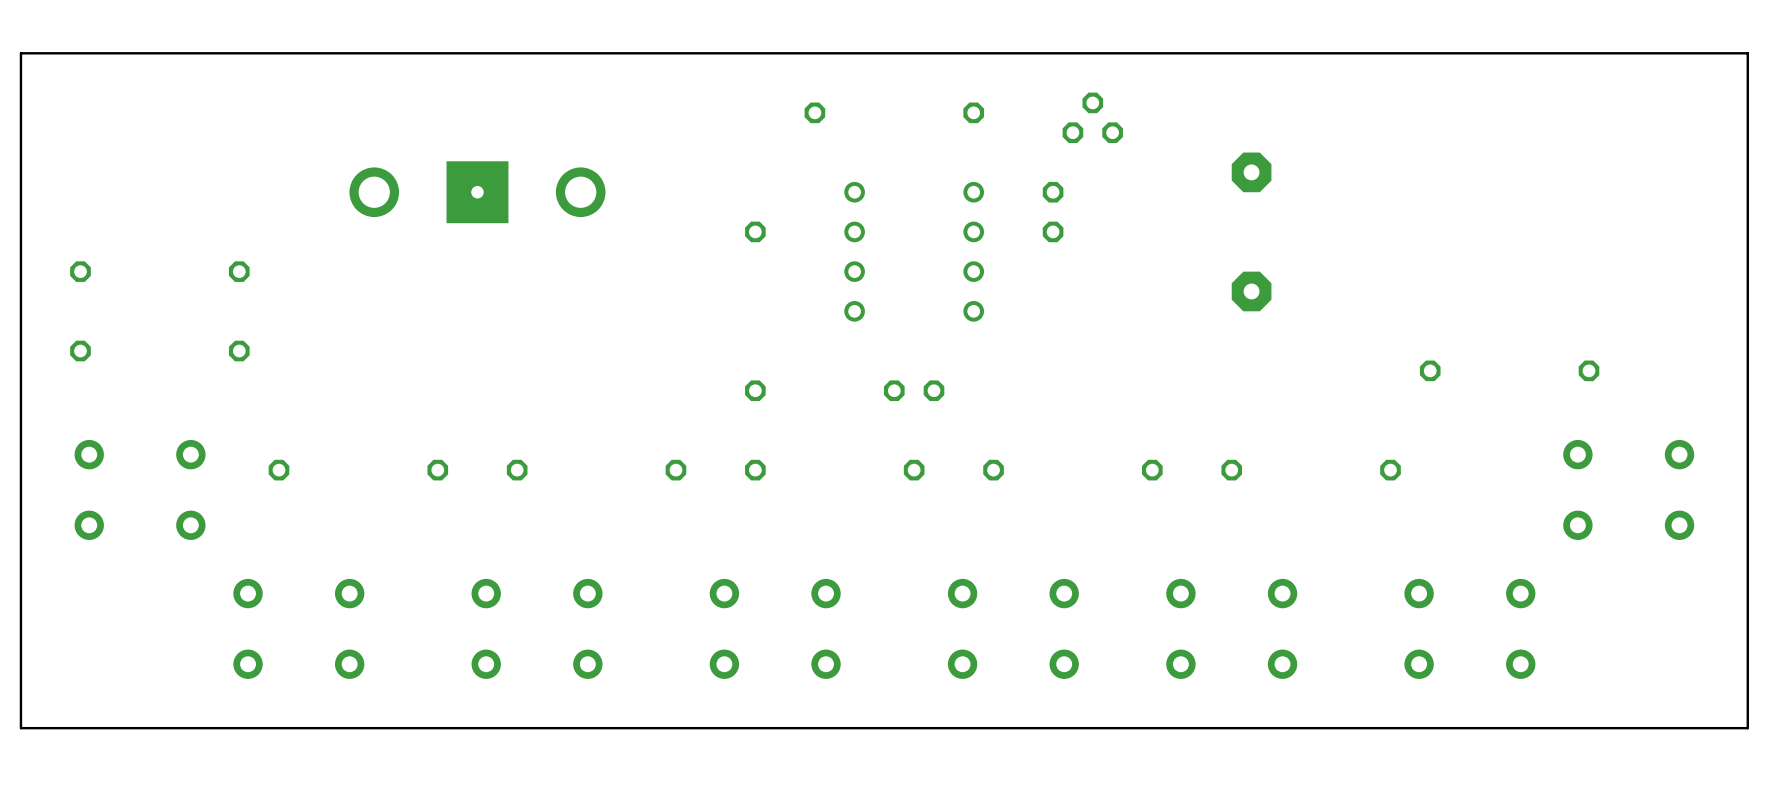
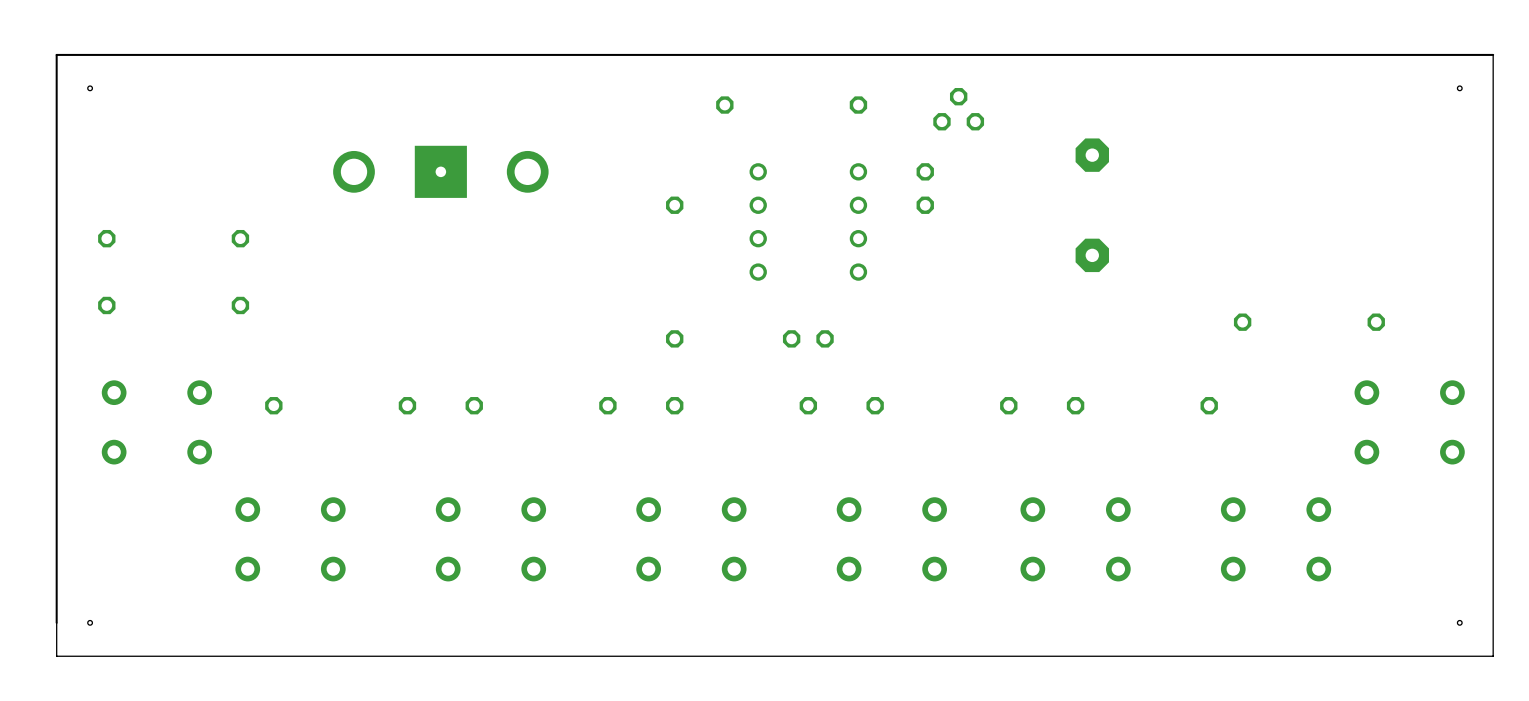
board edge: (1727, 53) (1747, 53) (1747, 728) (20, 728) -> (1493, 54) (1493, 656) (56, 656) (56, 622)
hole: none -> (90, 88)
hole: none -> (1459, 88)
hole: none -> (90, 622)
hole: none -> (1459, 622)

